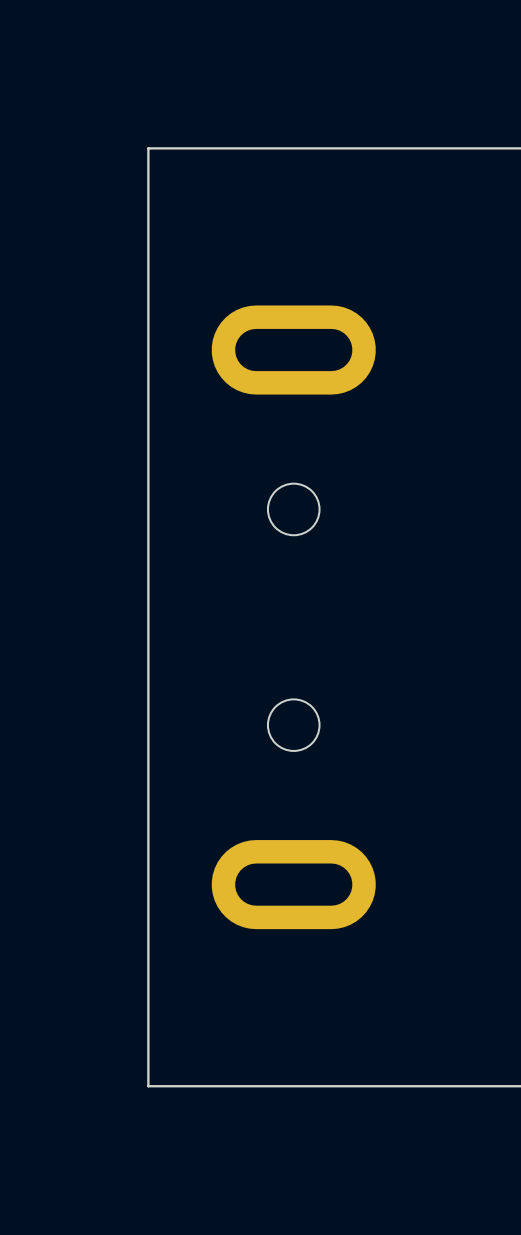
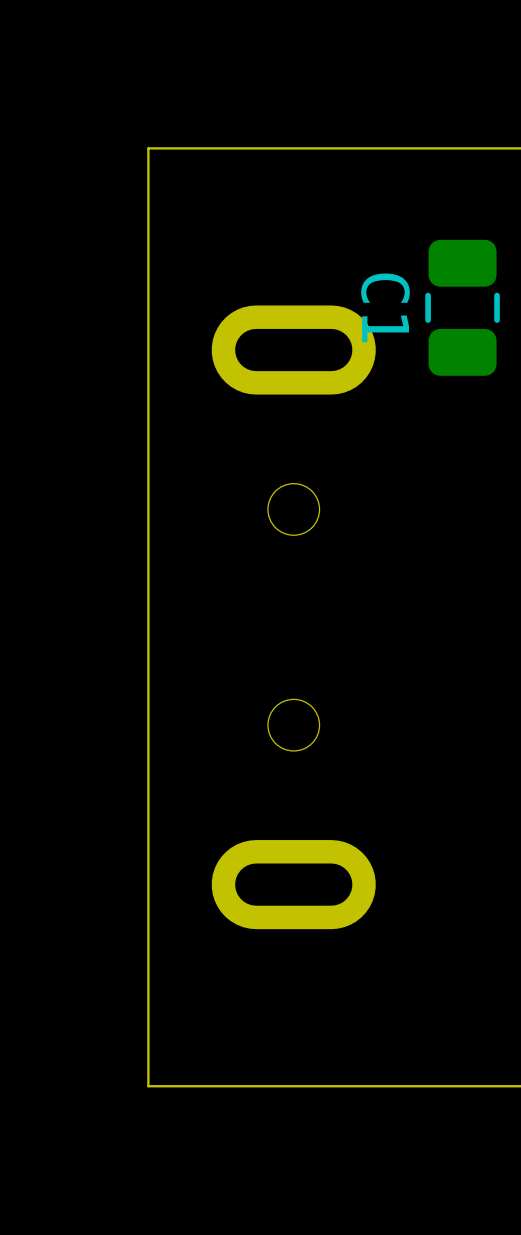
C1: none -> (462, 307)

